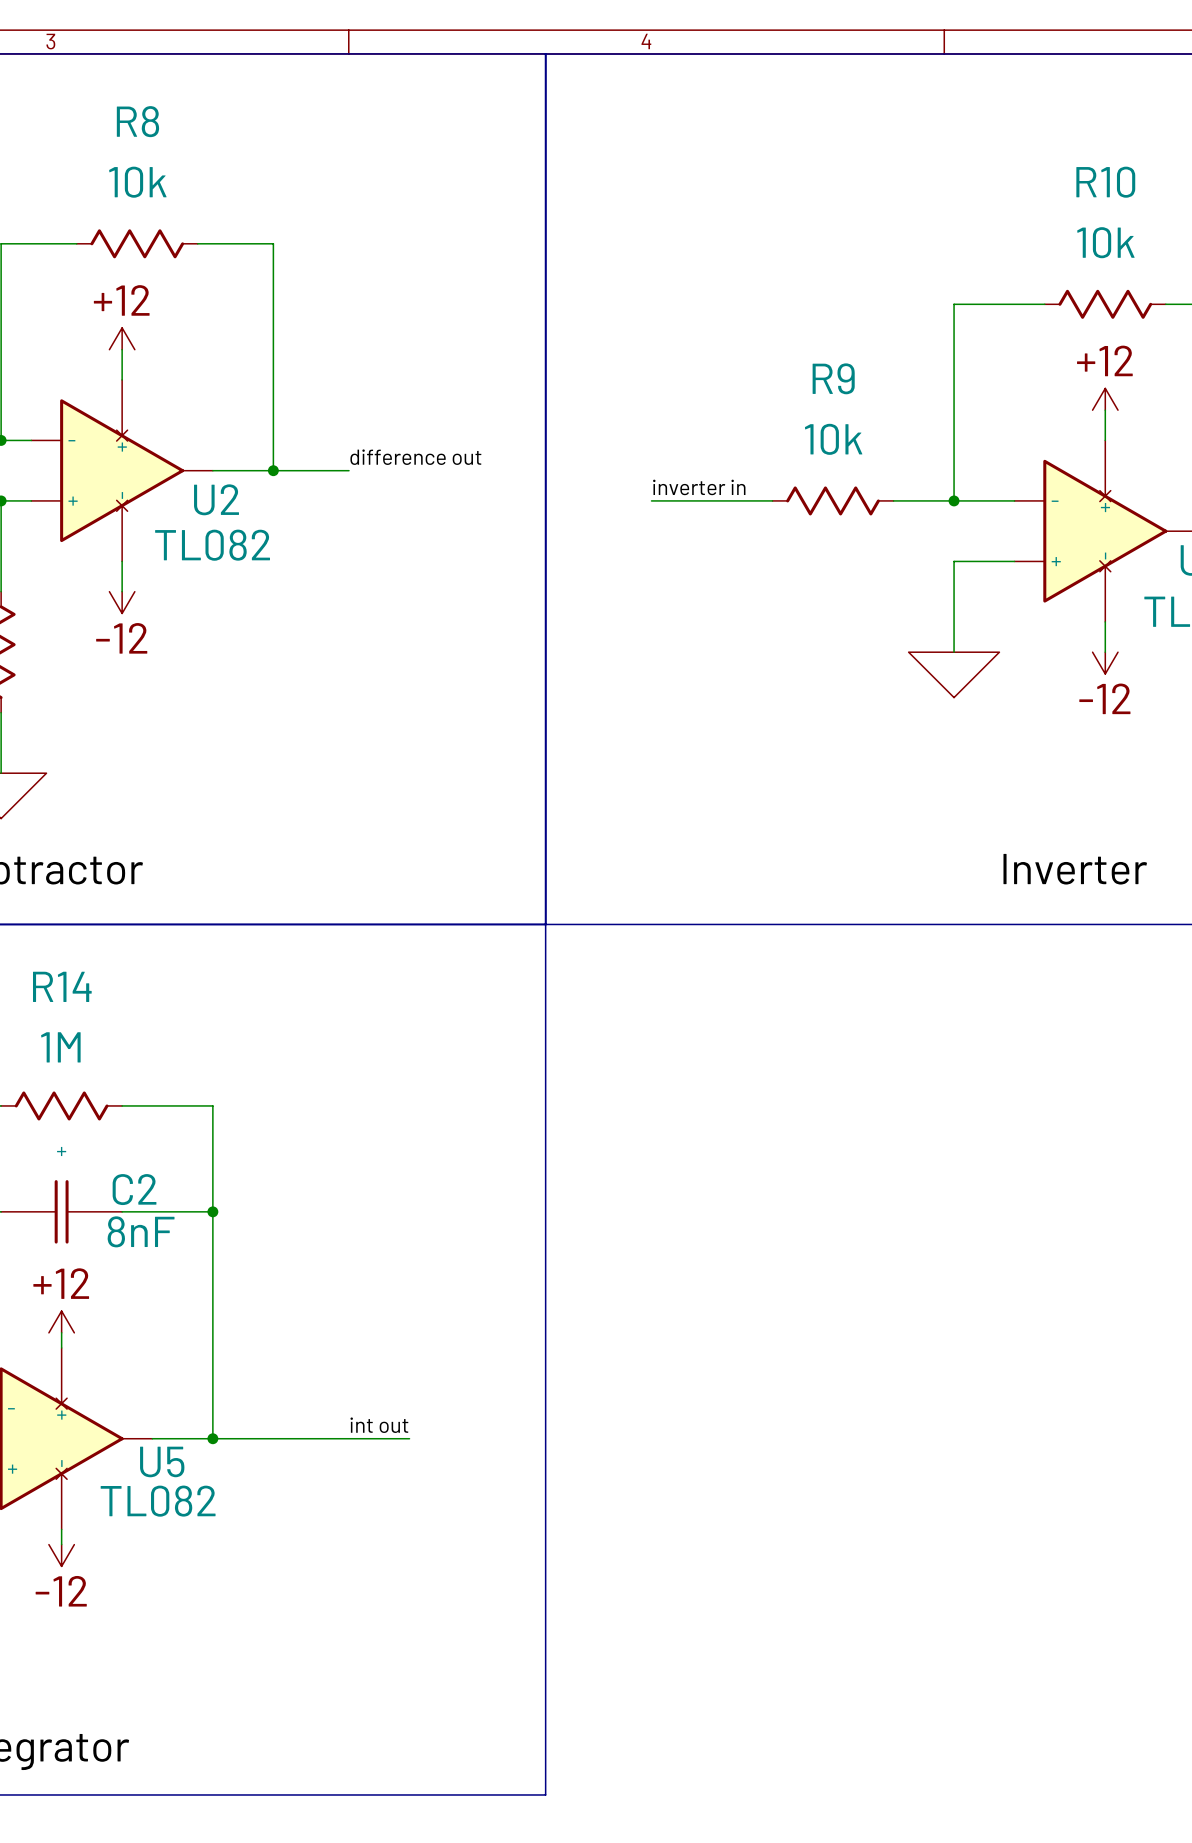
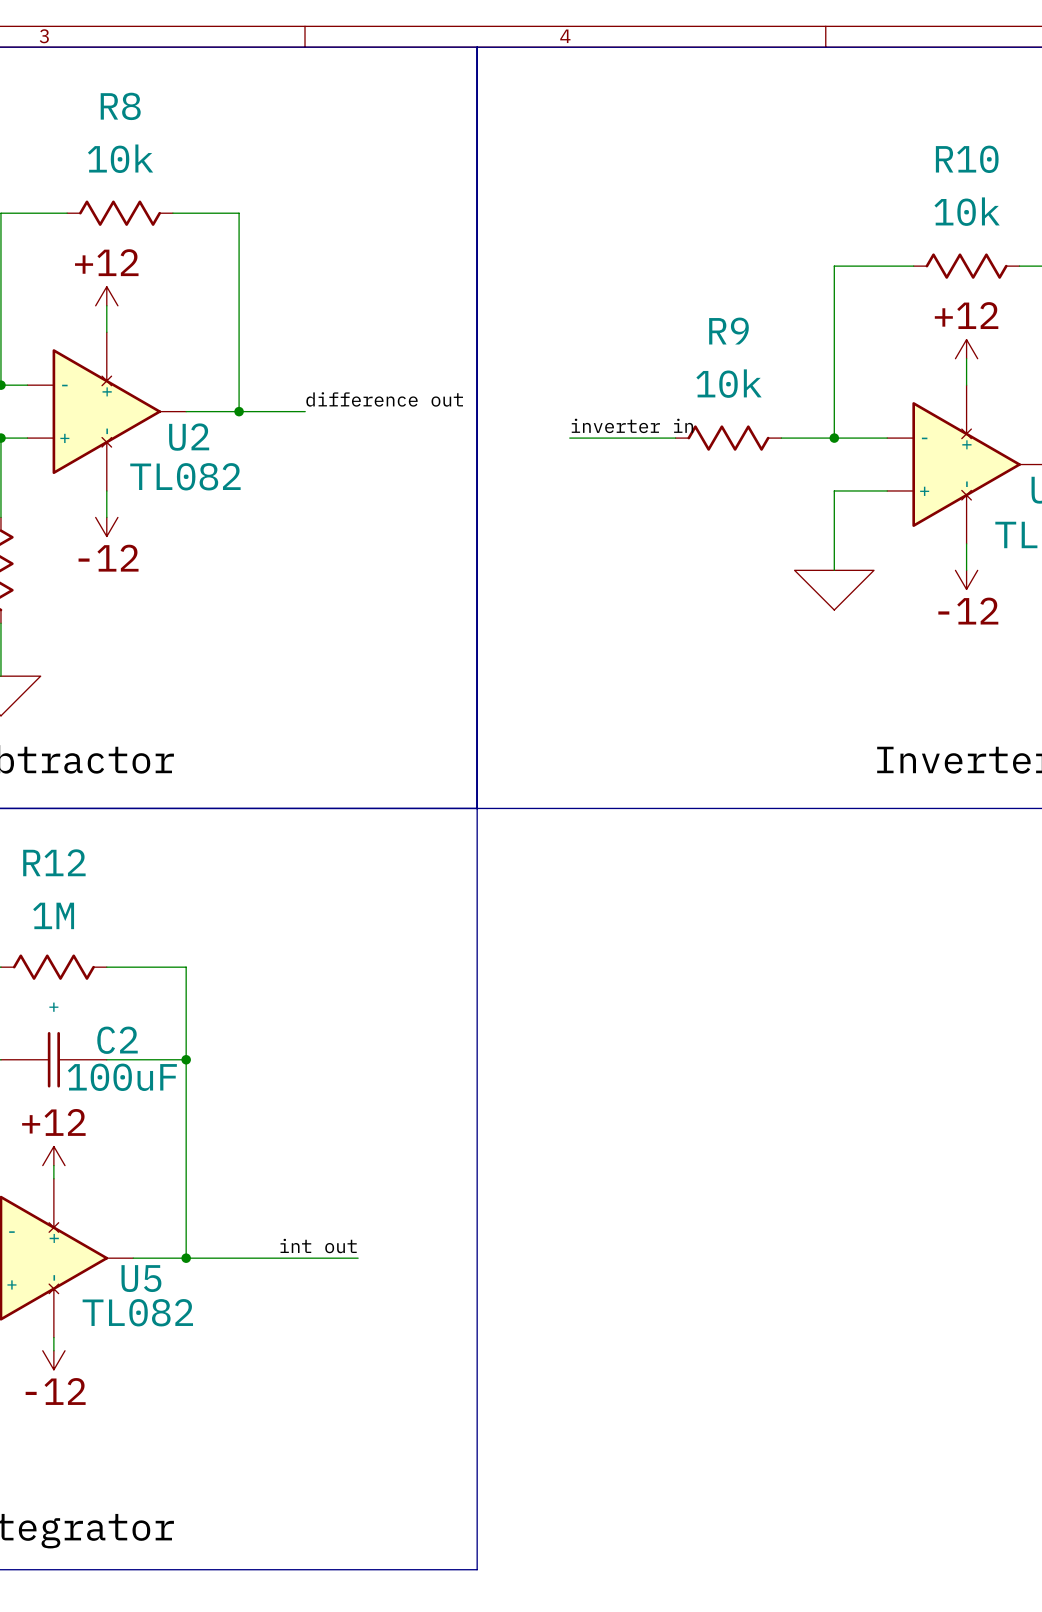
R14 name: R14 (62, 986) -> R12 (54, 862)
C2 value: 8nF (141, 1231) -> 100uF (122, 1077)

